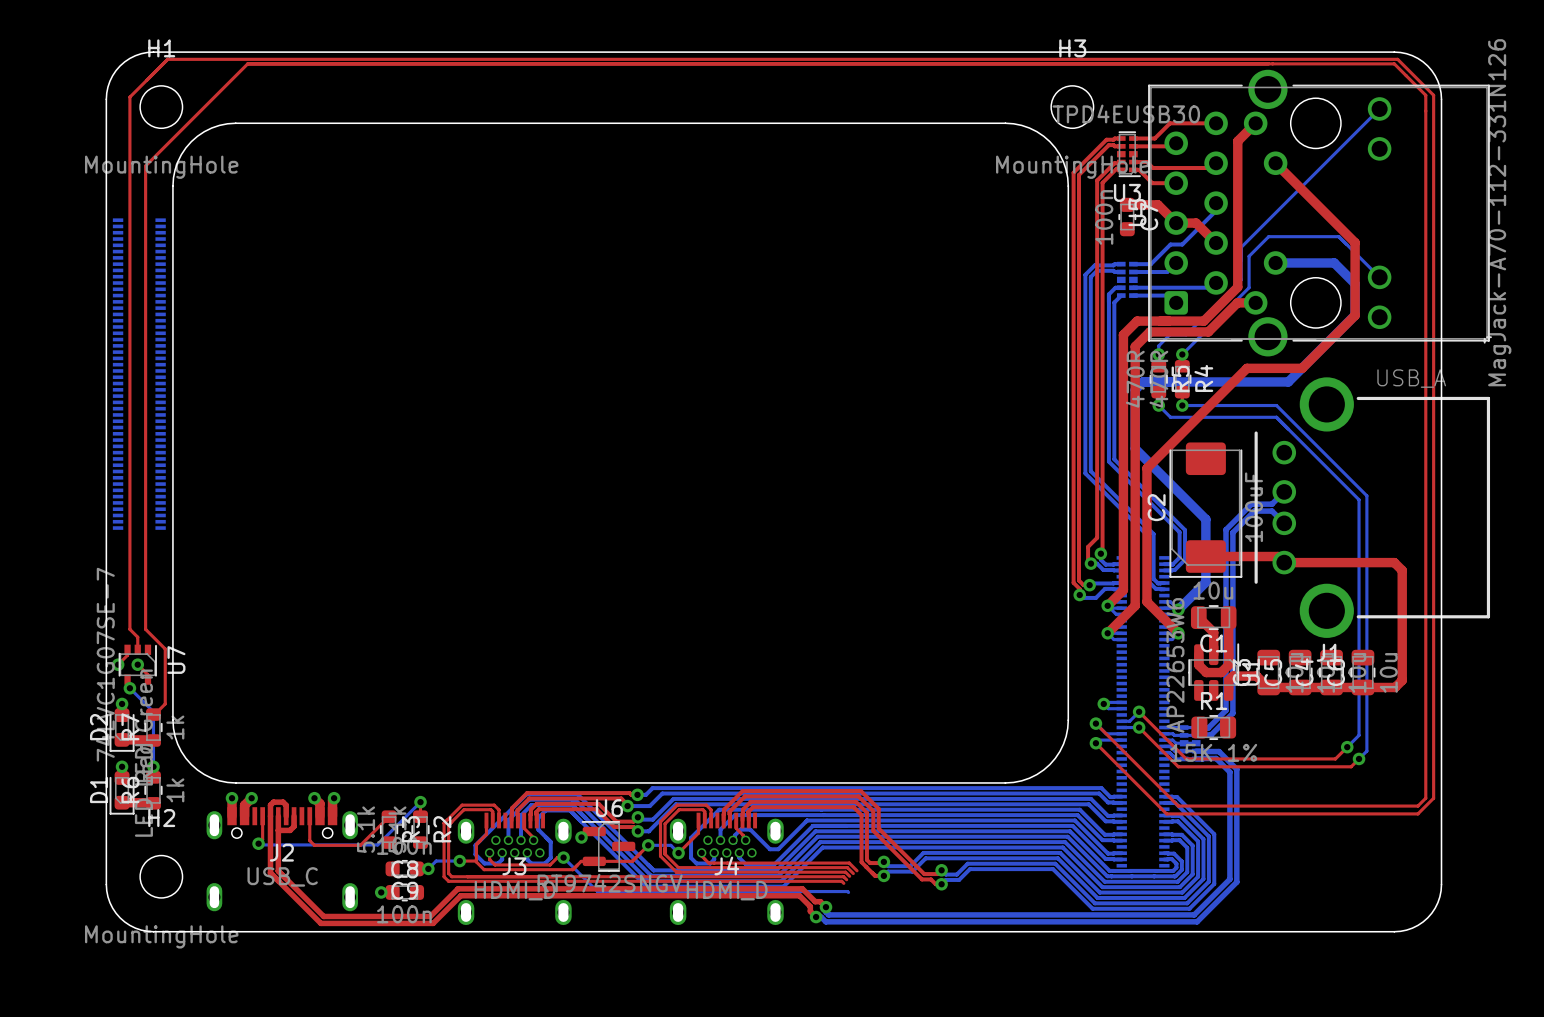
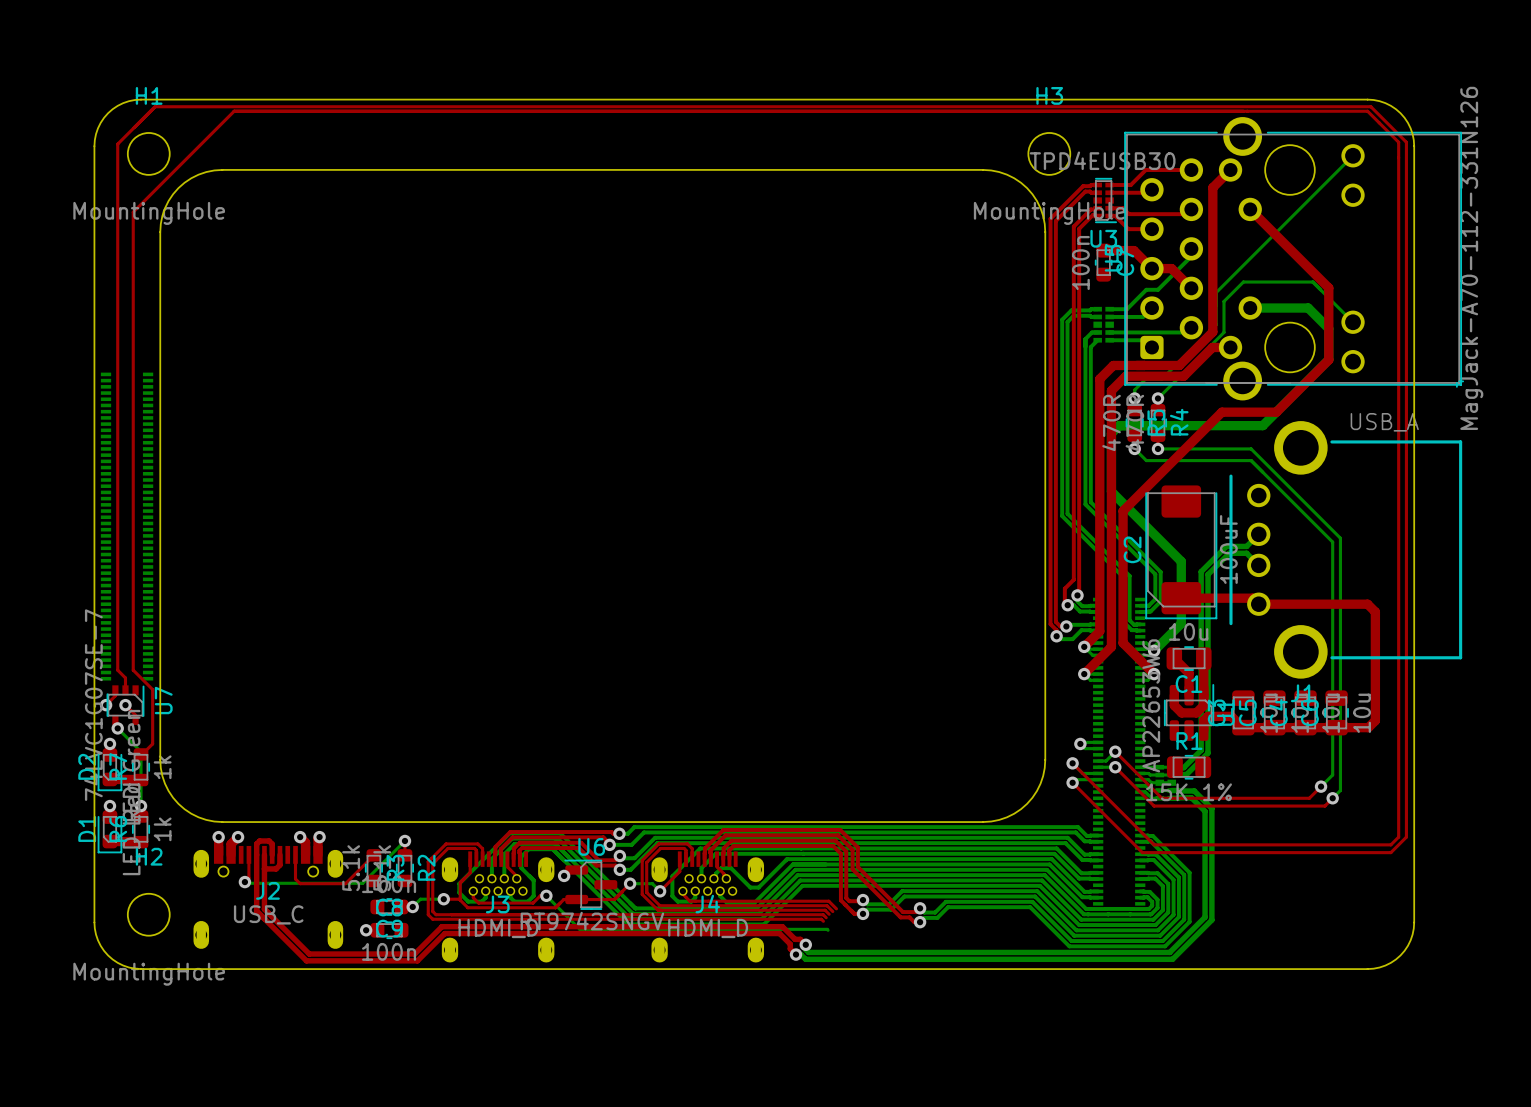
part position: (139, 374) -> (127, 526)

